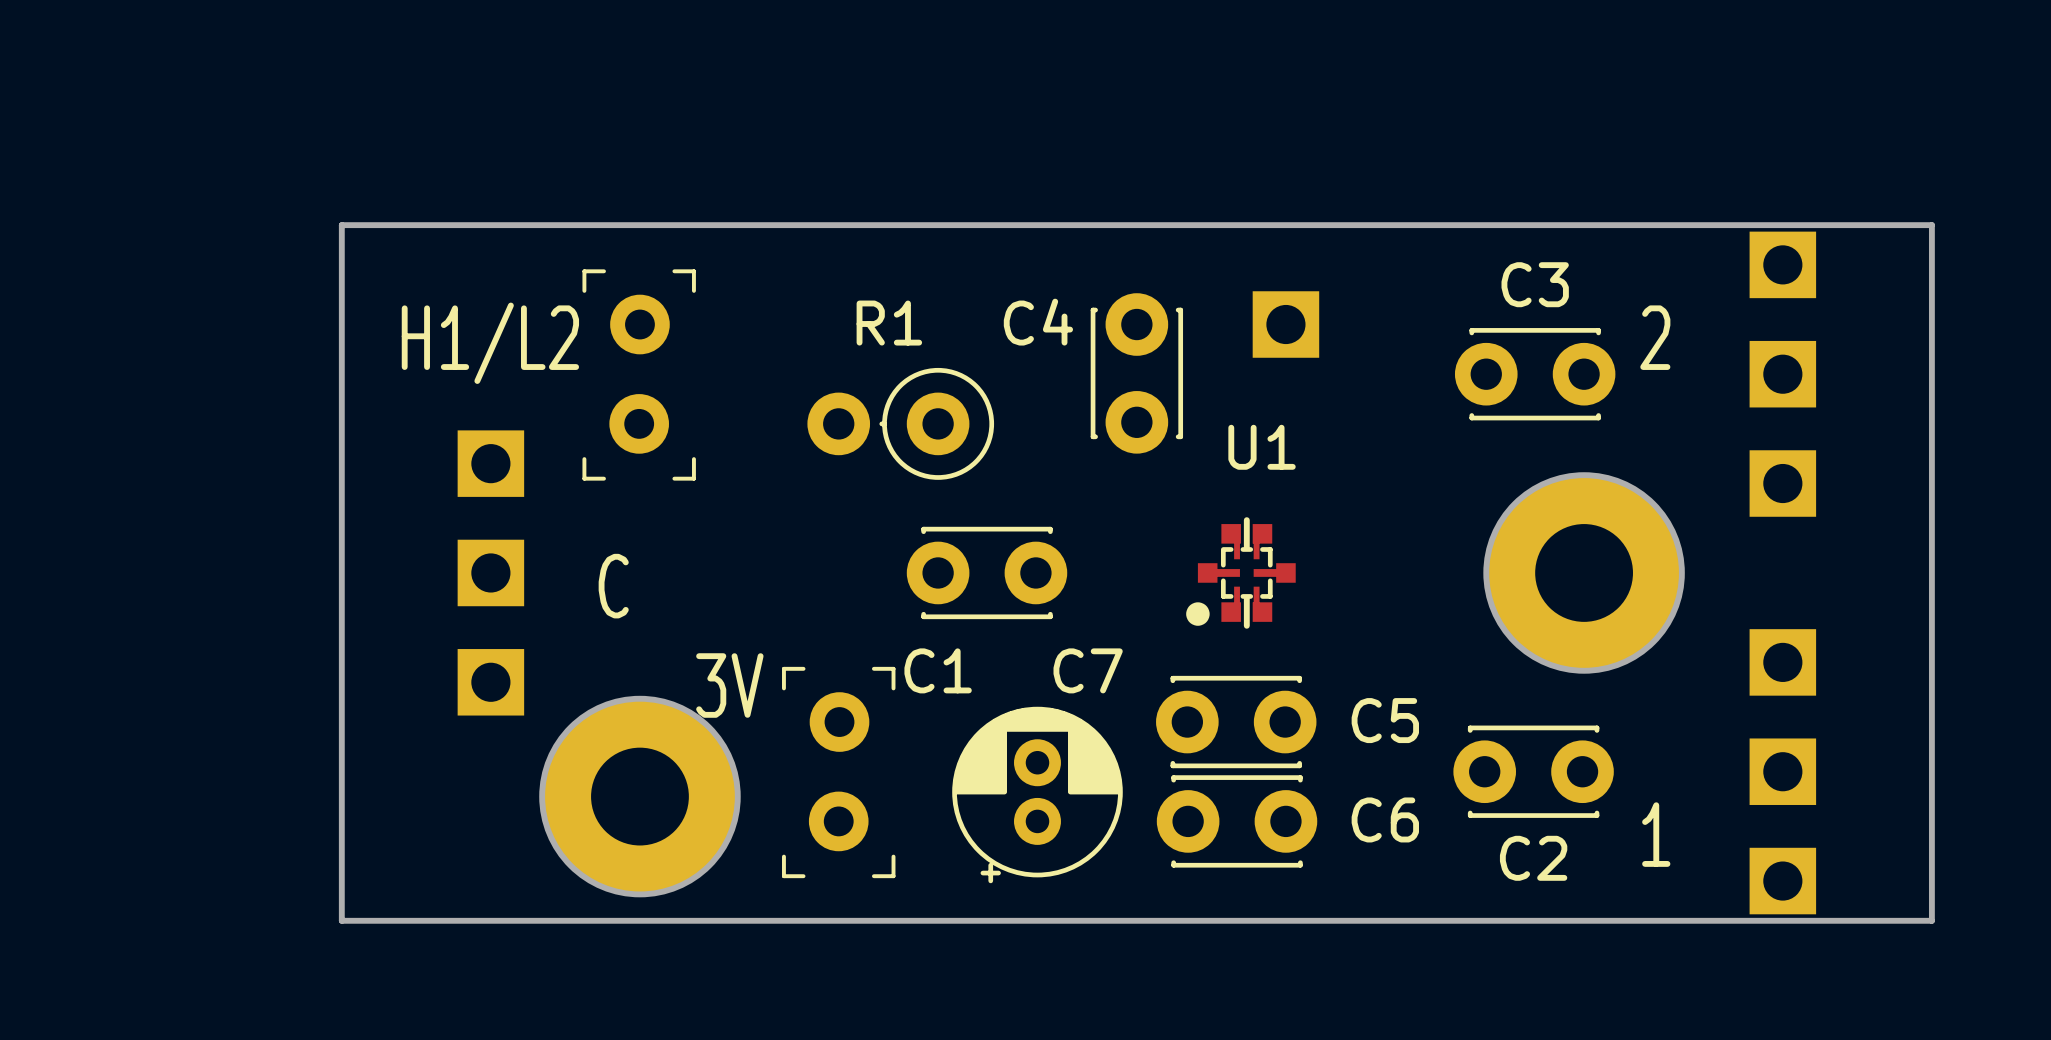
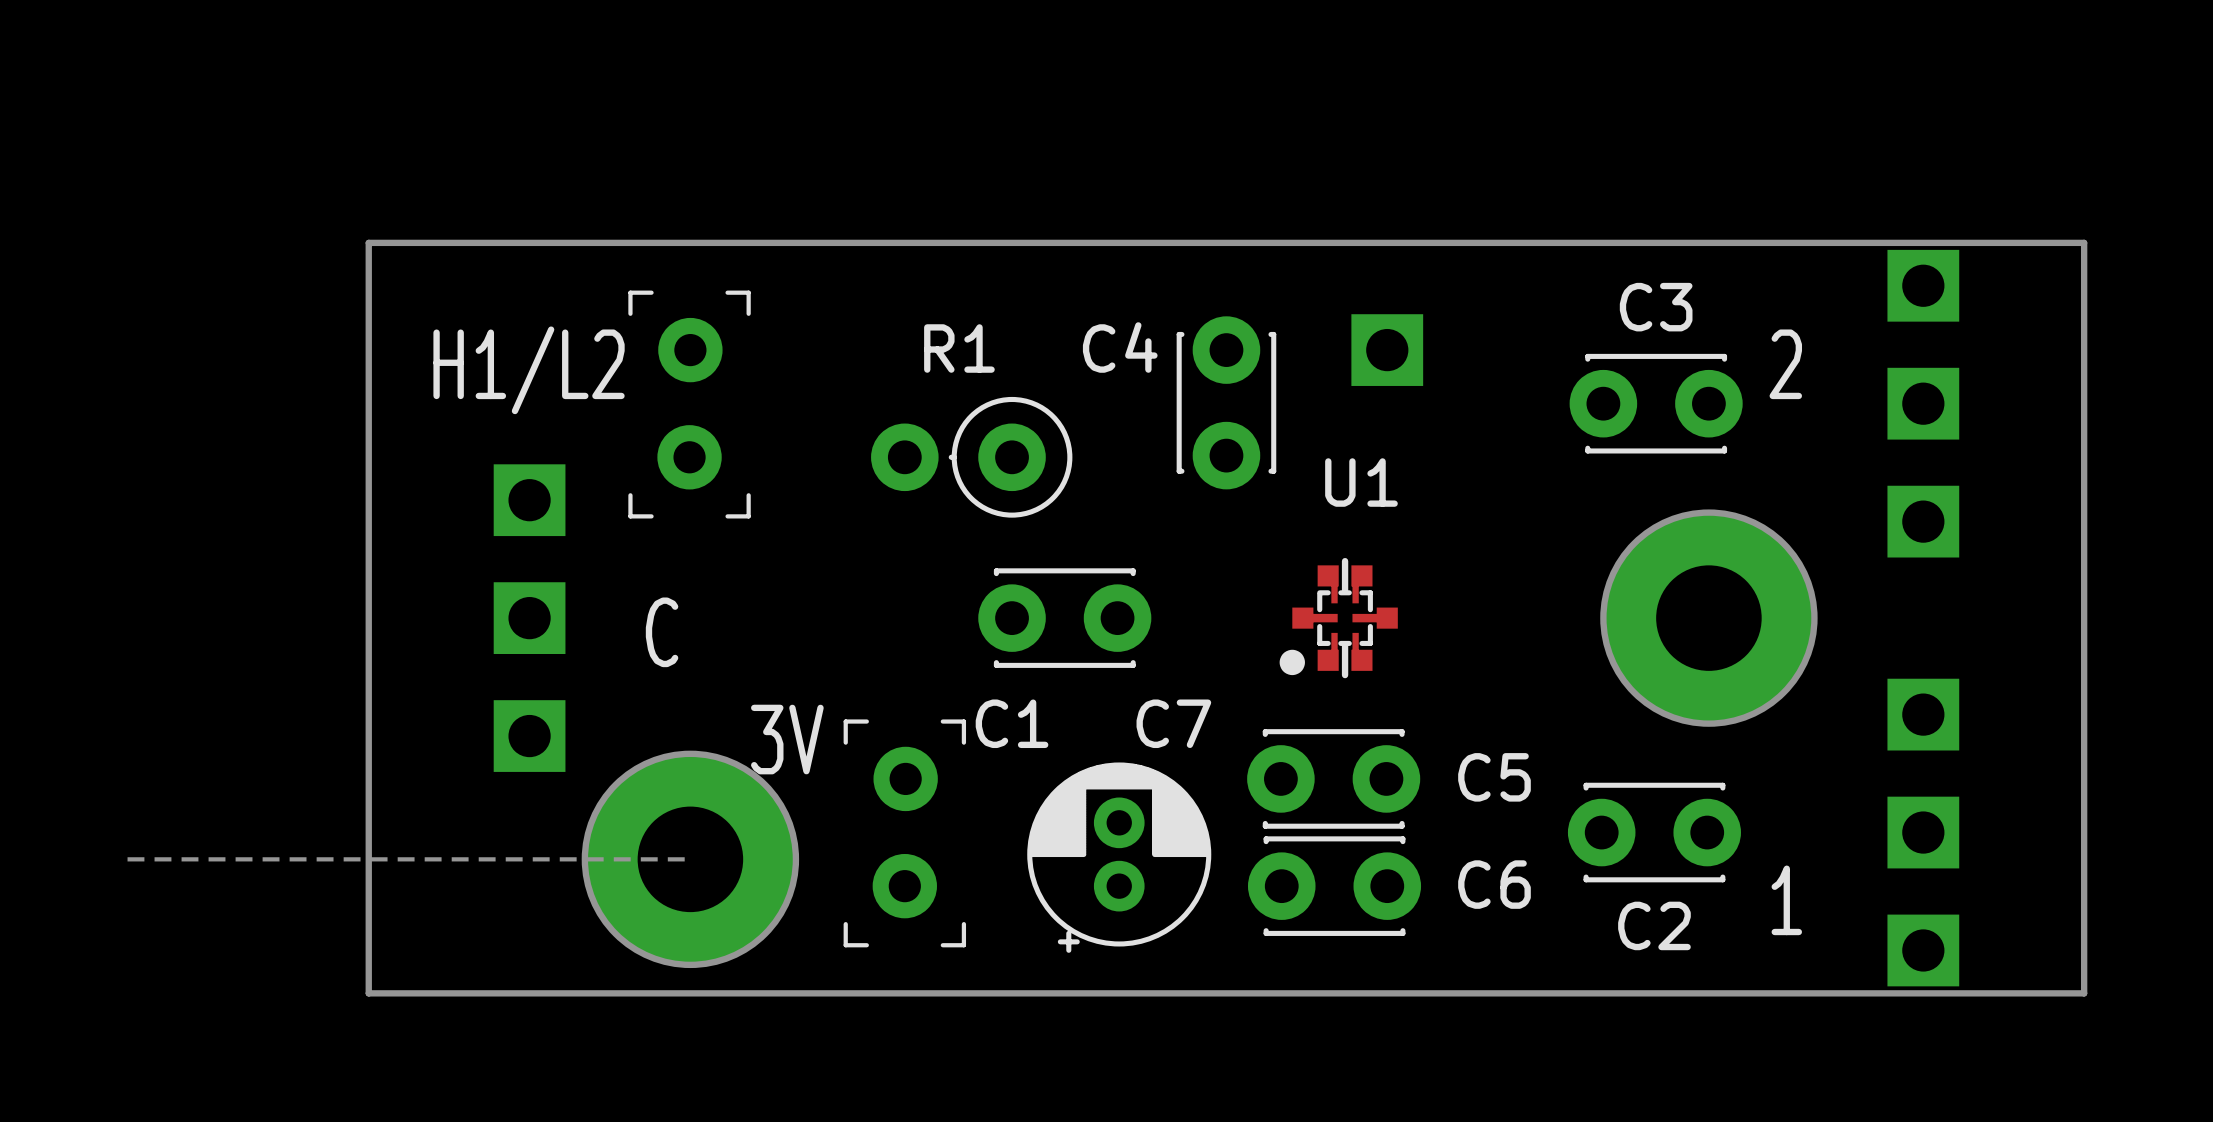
line: none -> (127, 859) (690, 859)

